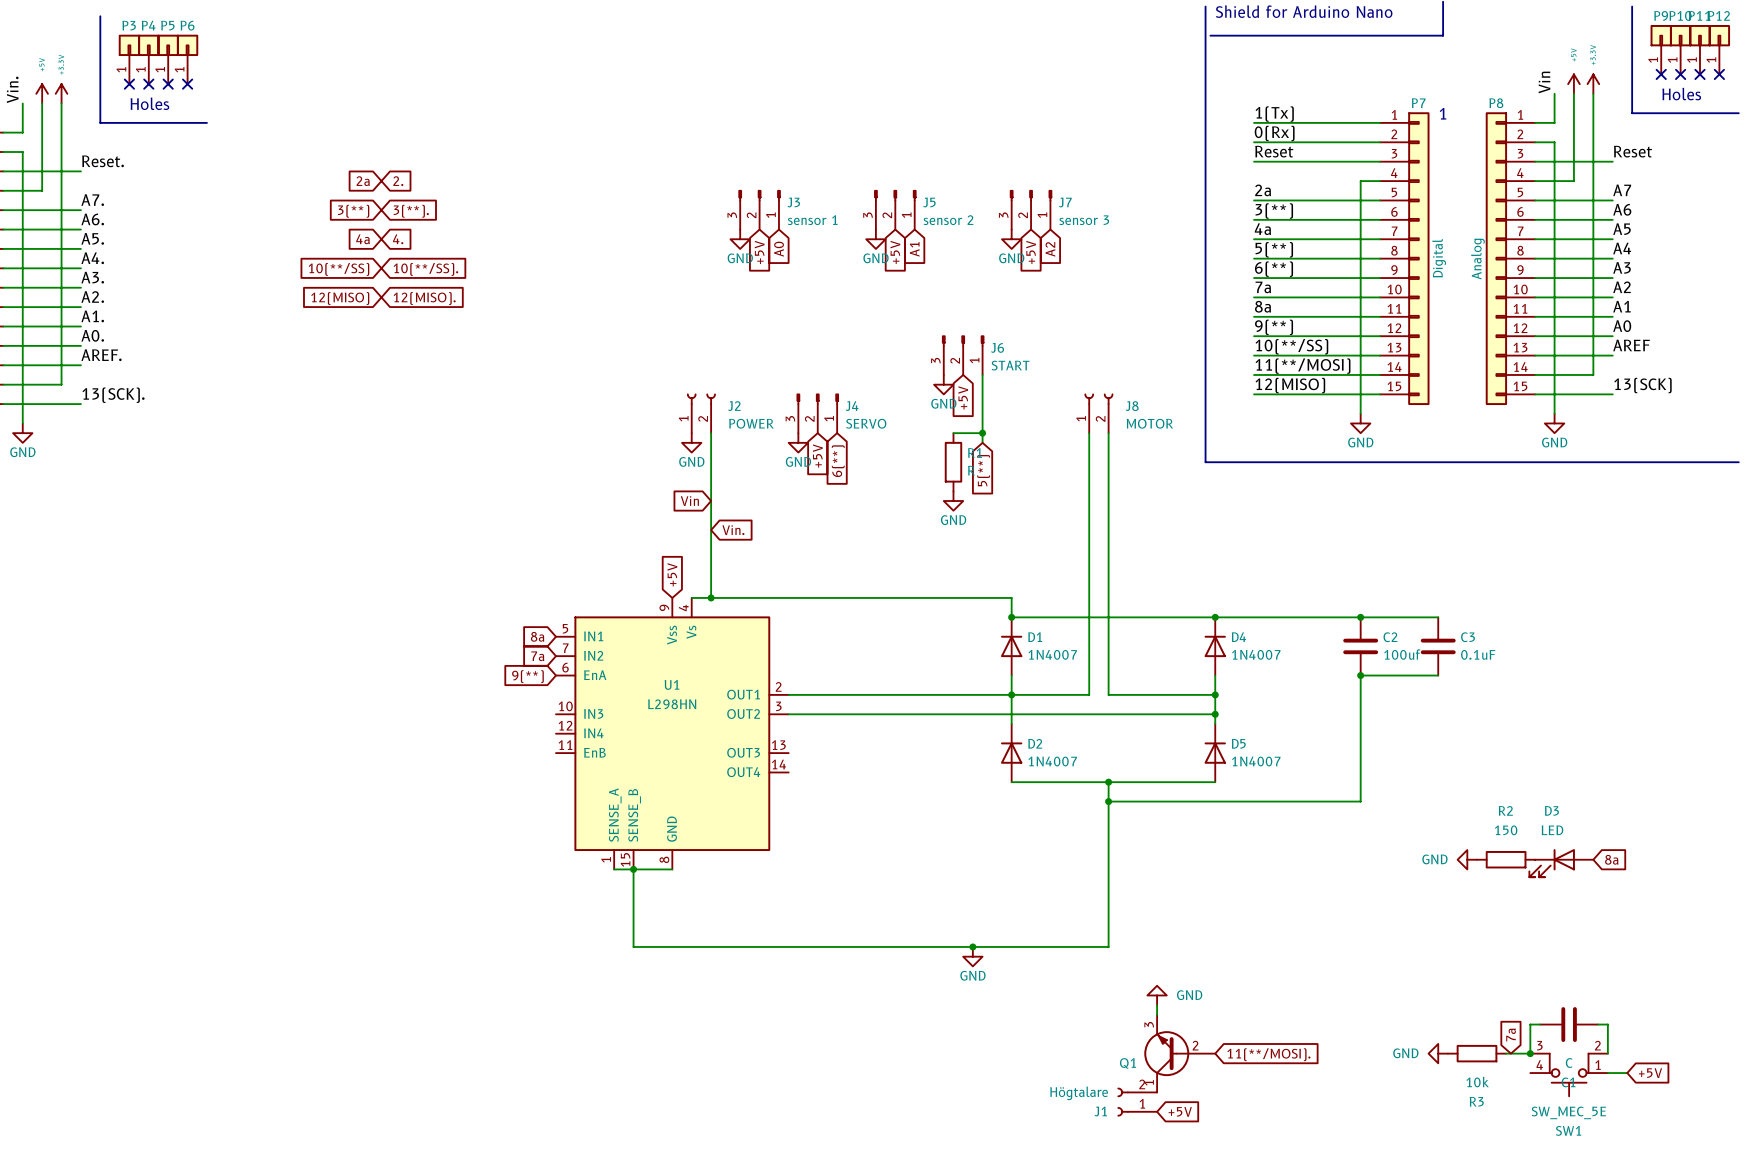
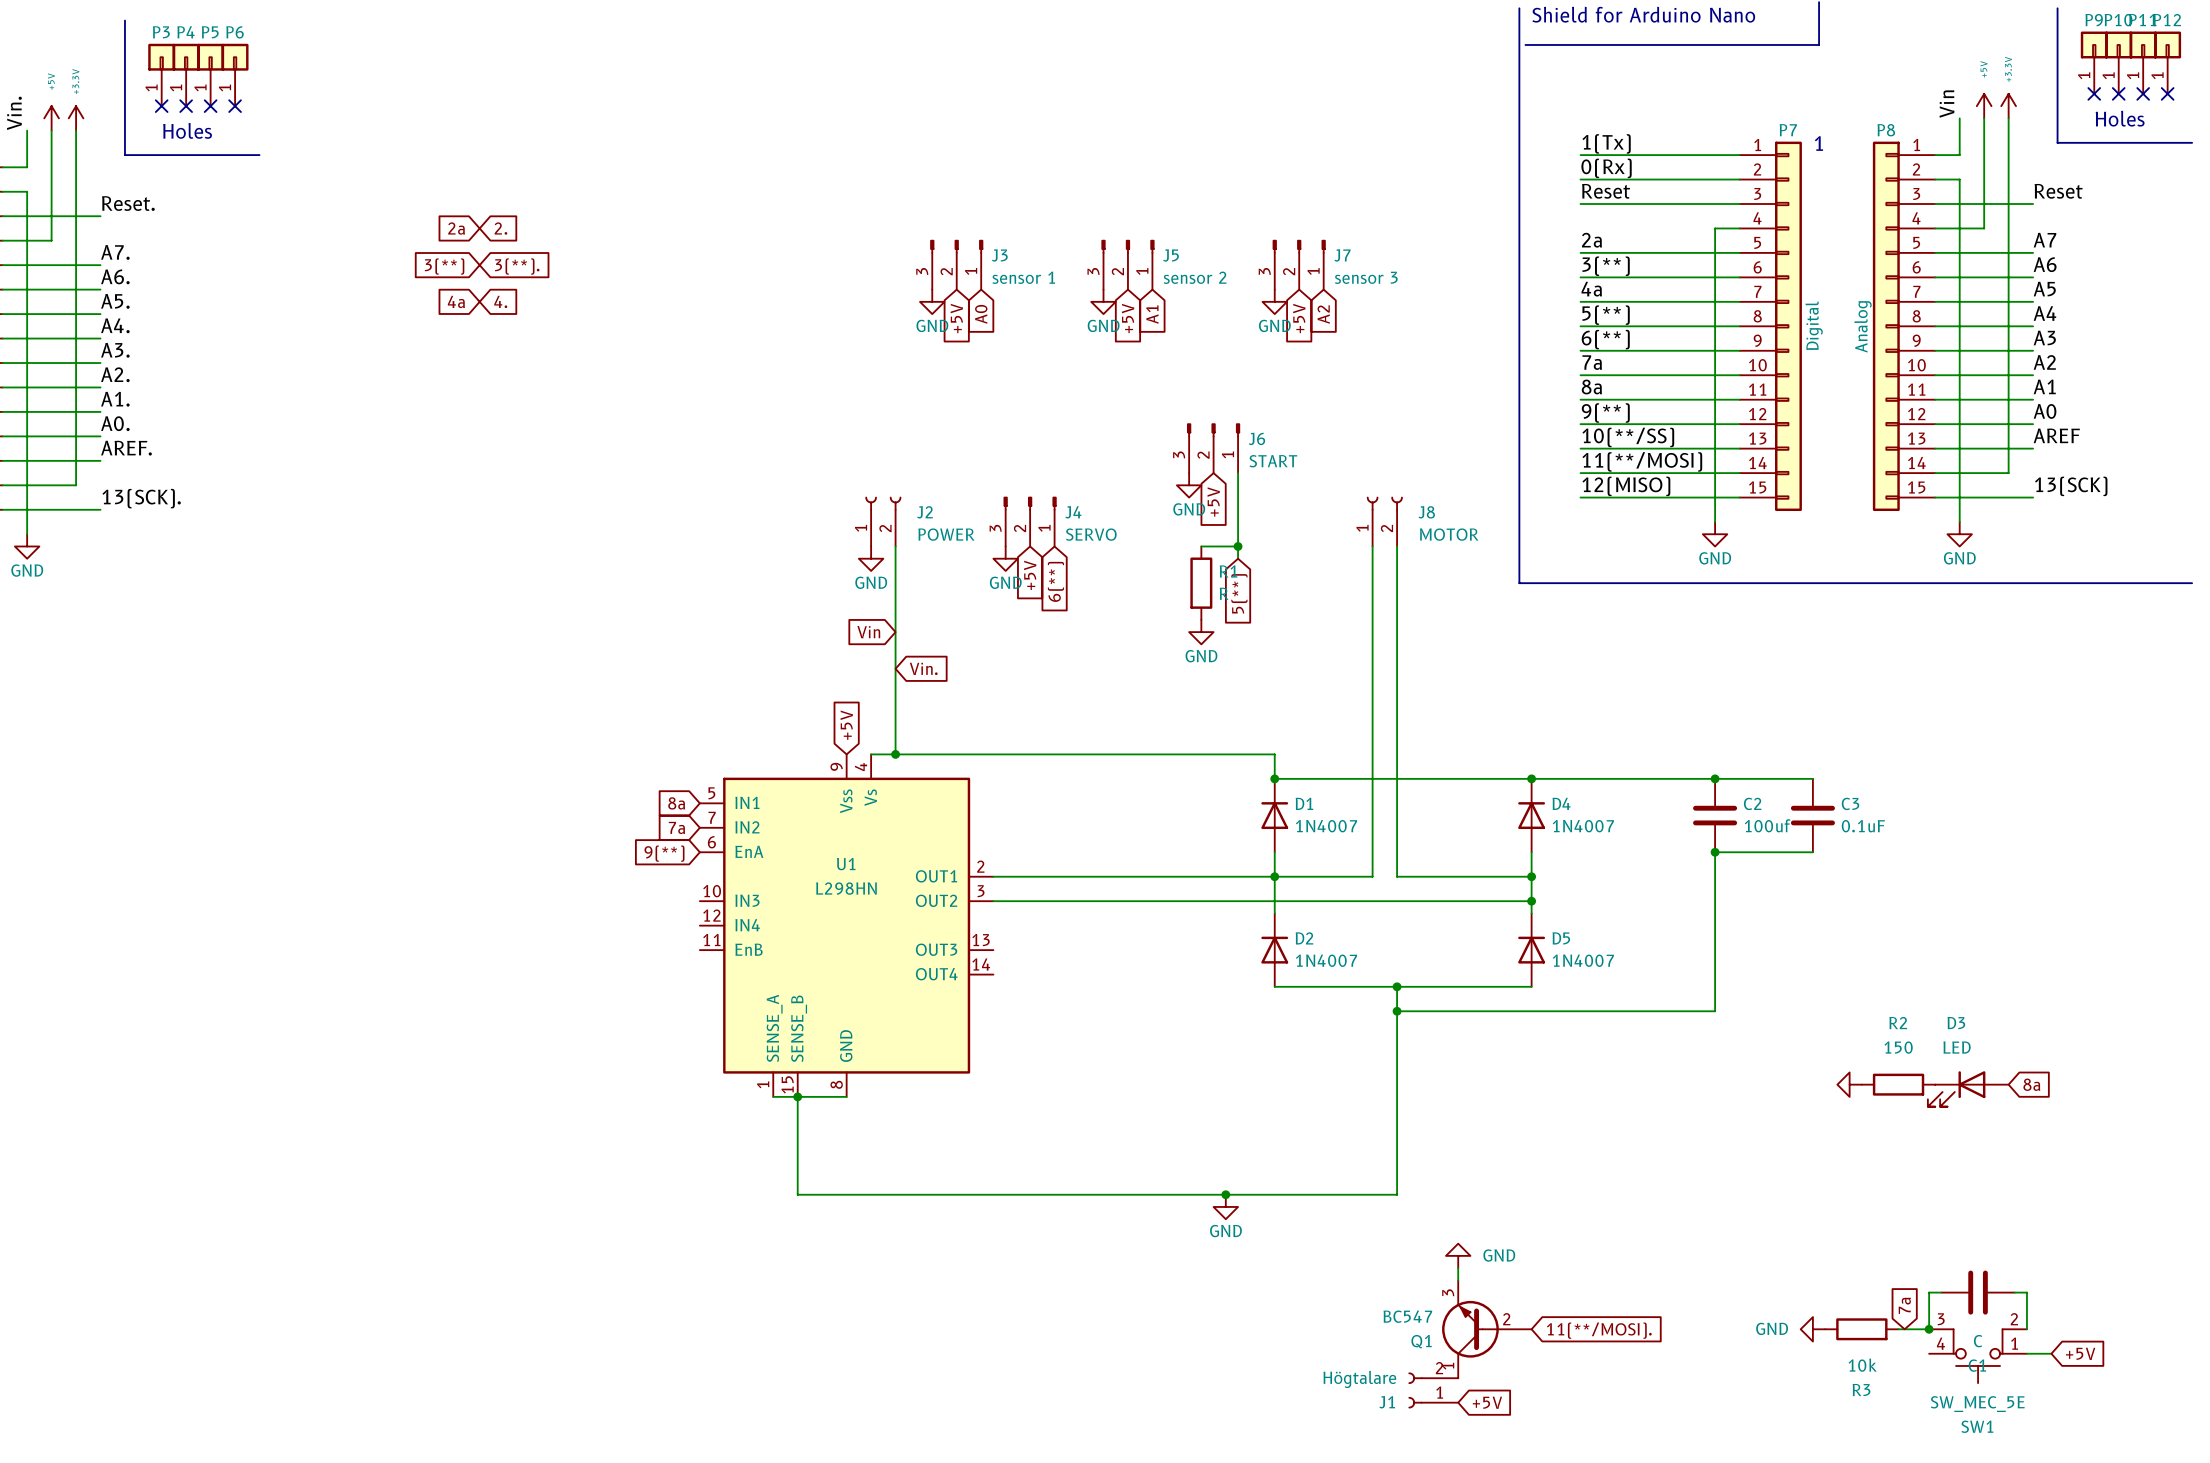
global label: 10(**/SS) (338, 269) -> none
global label: 10(**/SS). (425, 269) -> none
global label: 12(MISO) (340, 298) -> none
global label: 12(MISO). (424, 298) -> none
power symbol text: GND (1434, 859) -> none
Q1 value: none -> BC547 (1407, 1316)

